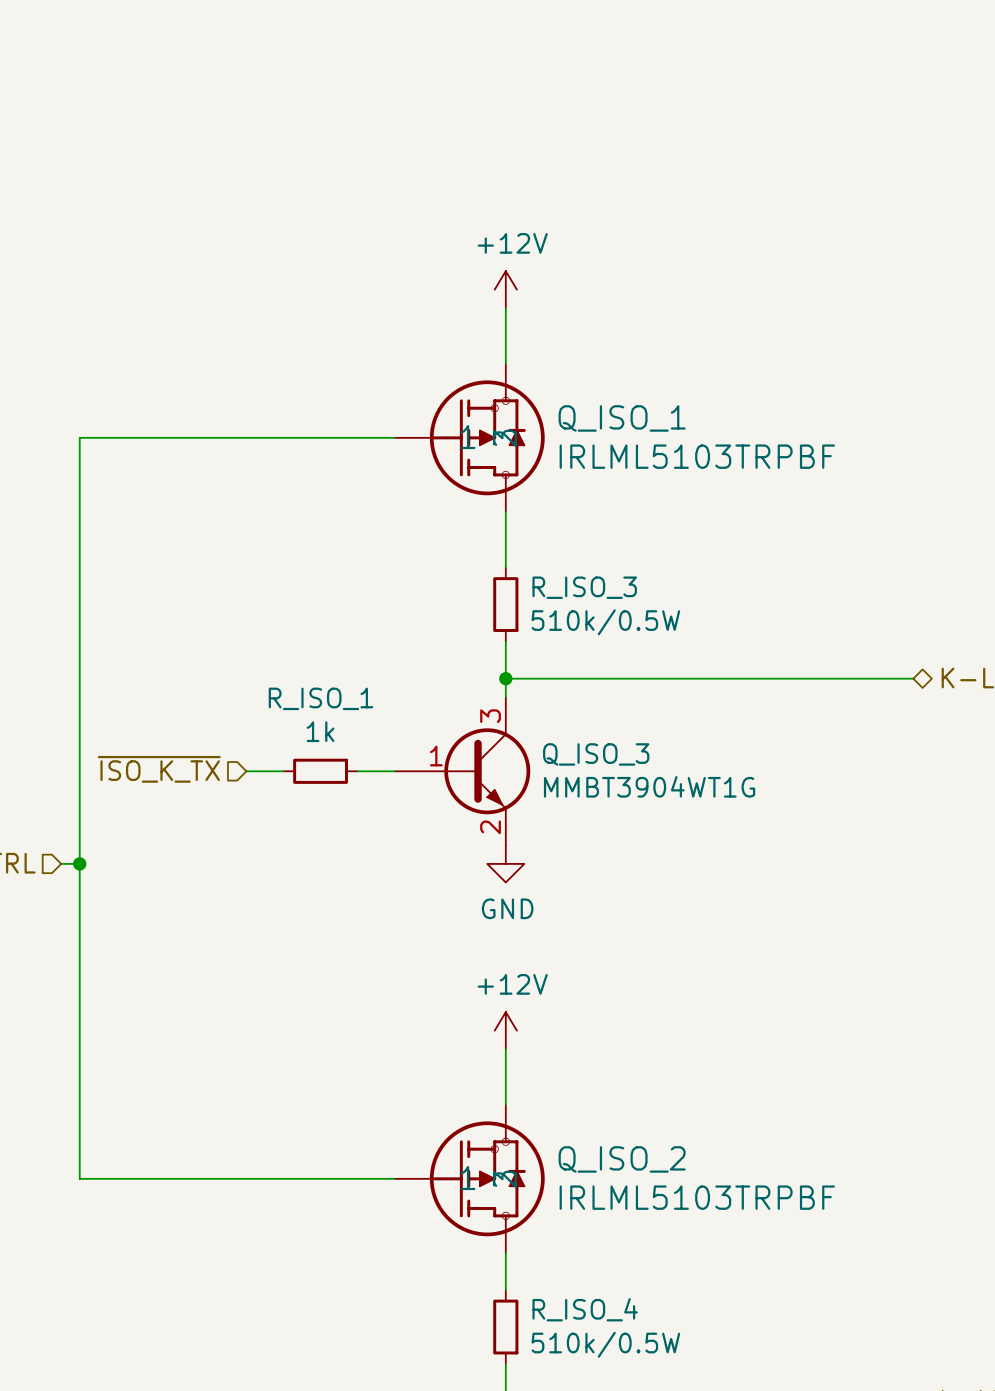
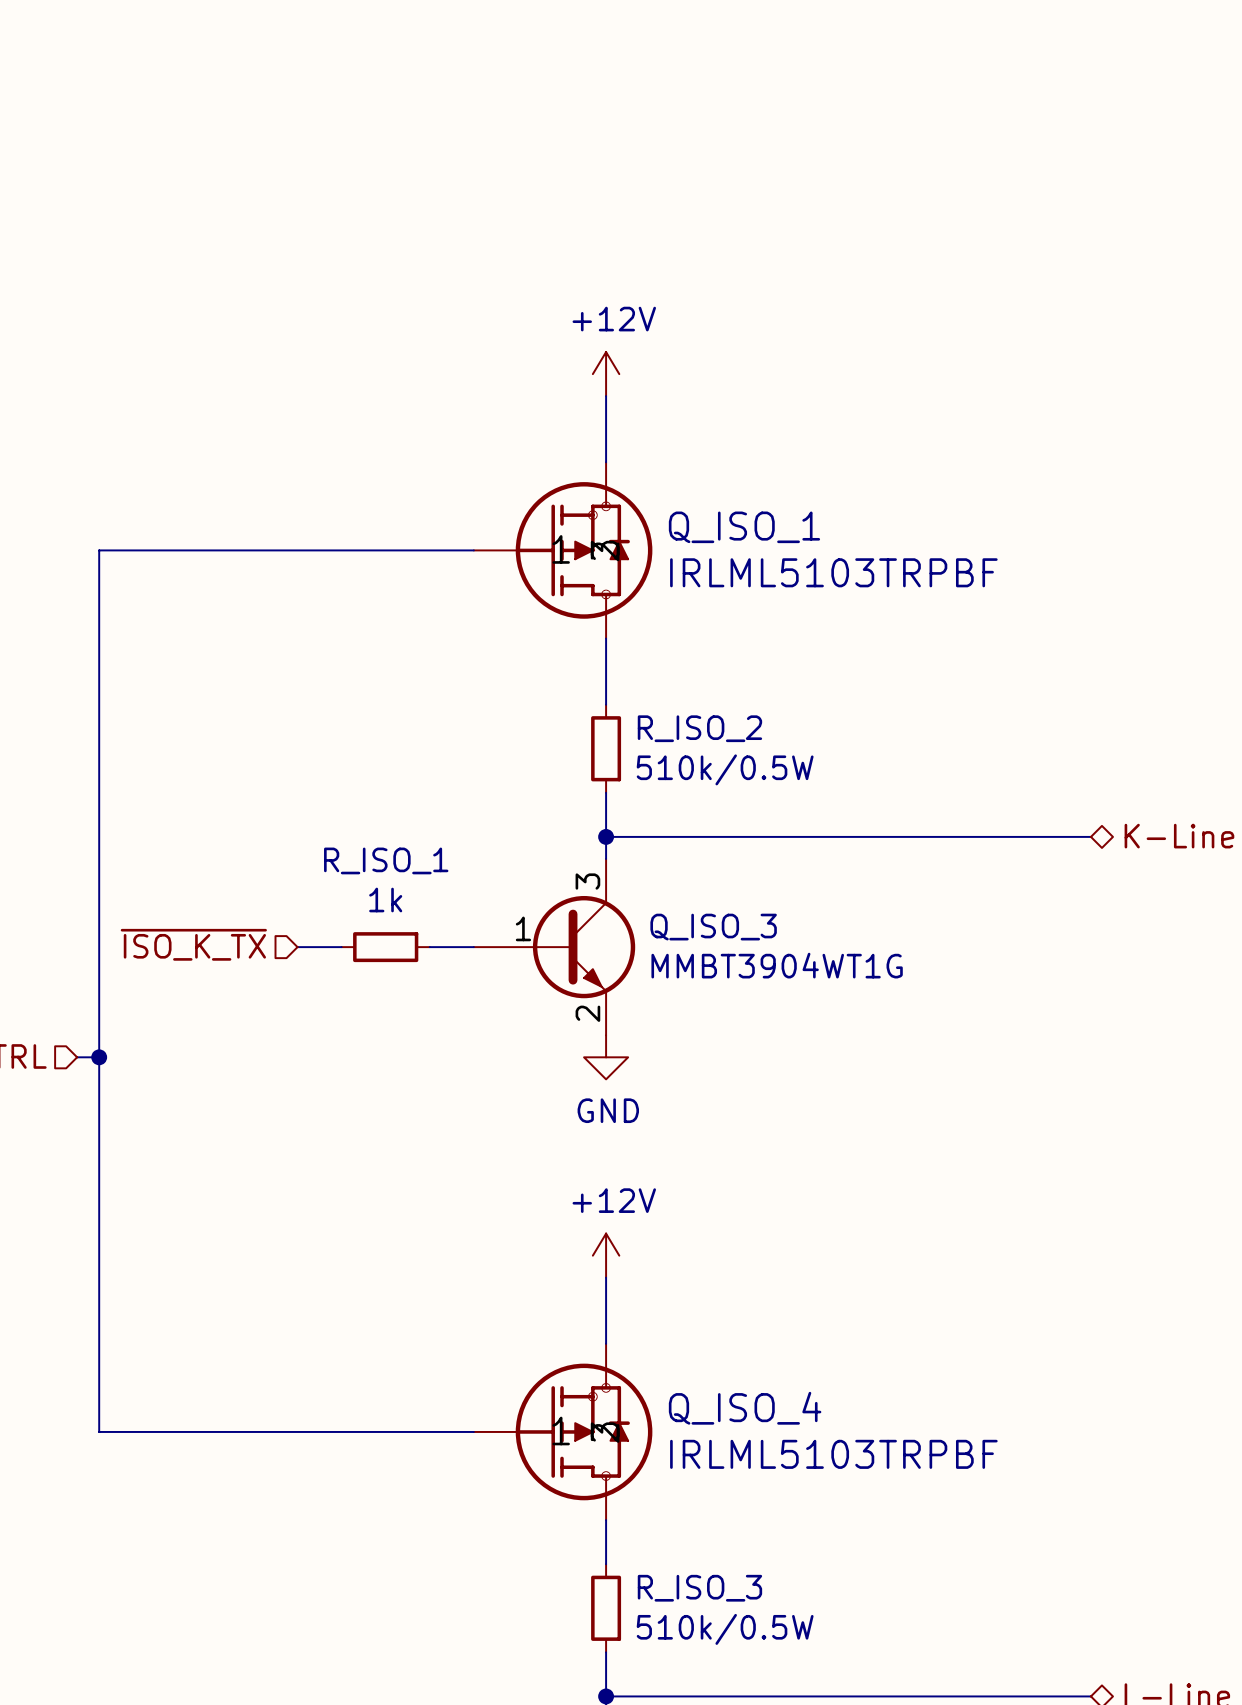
R_ISO_3 name: R_ISO_3 (584, 587) -> R_ISO_2 (699, 728)
Q_ISO_2 name: Q_ISO_2 (622, 1159) -> Q_ISO_4 (745, 1408)
R_ISO_4 name: R_ISO_4 (585, 1309) -> R_ISO_3 (699, 1588)

